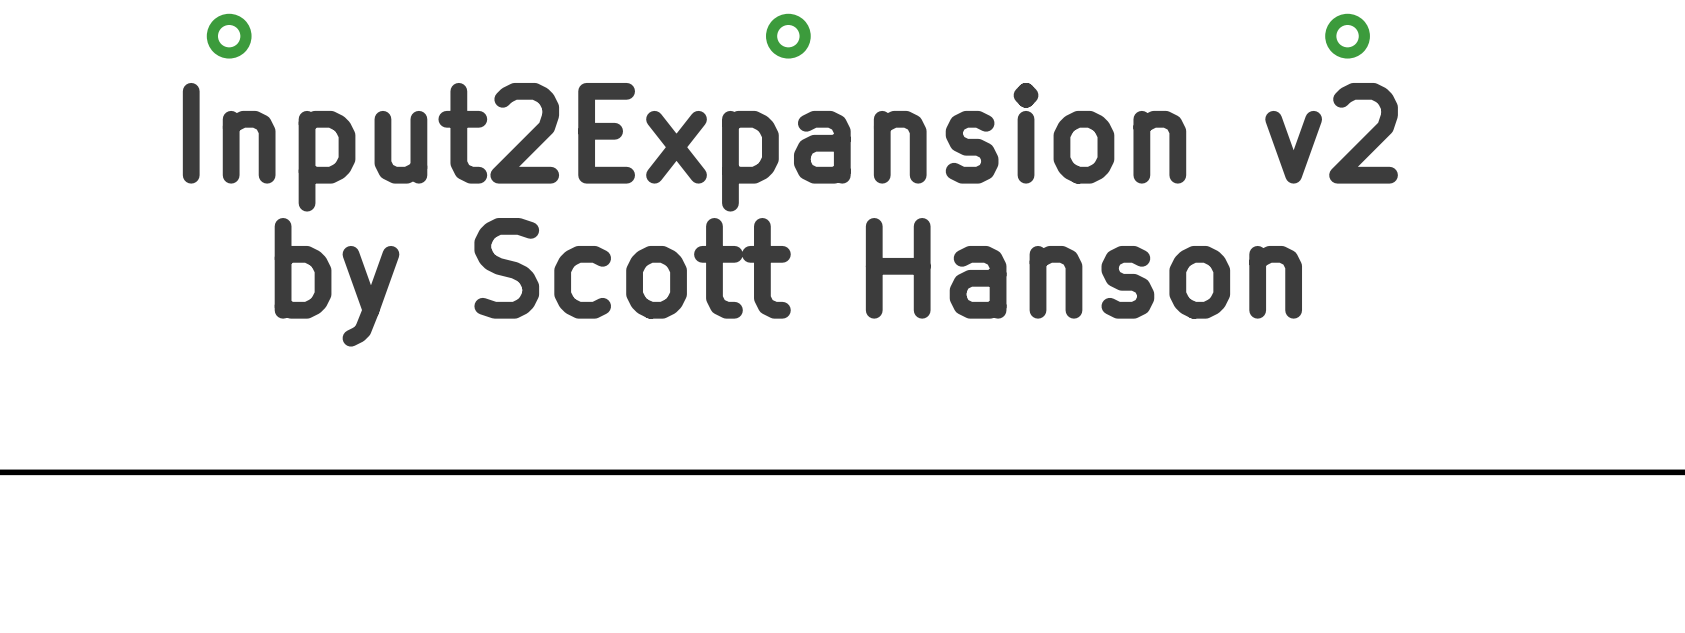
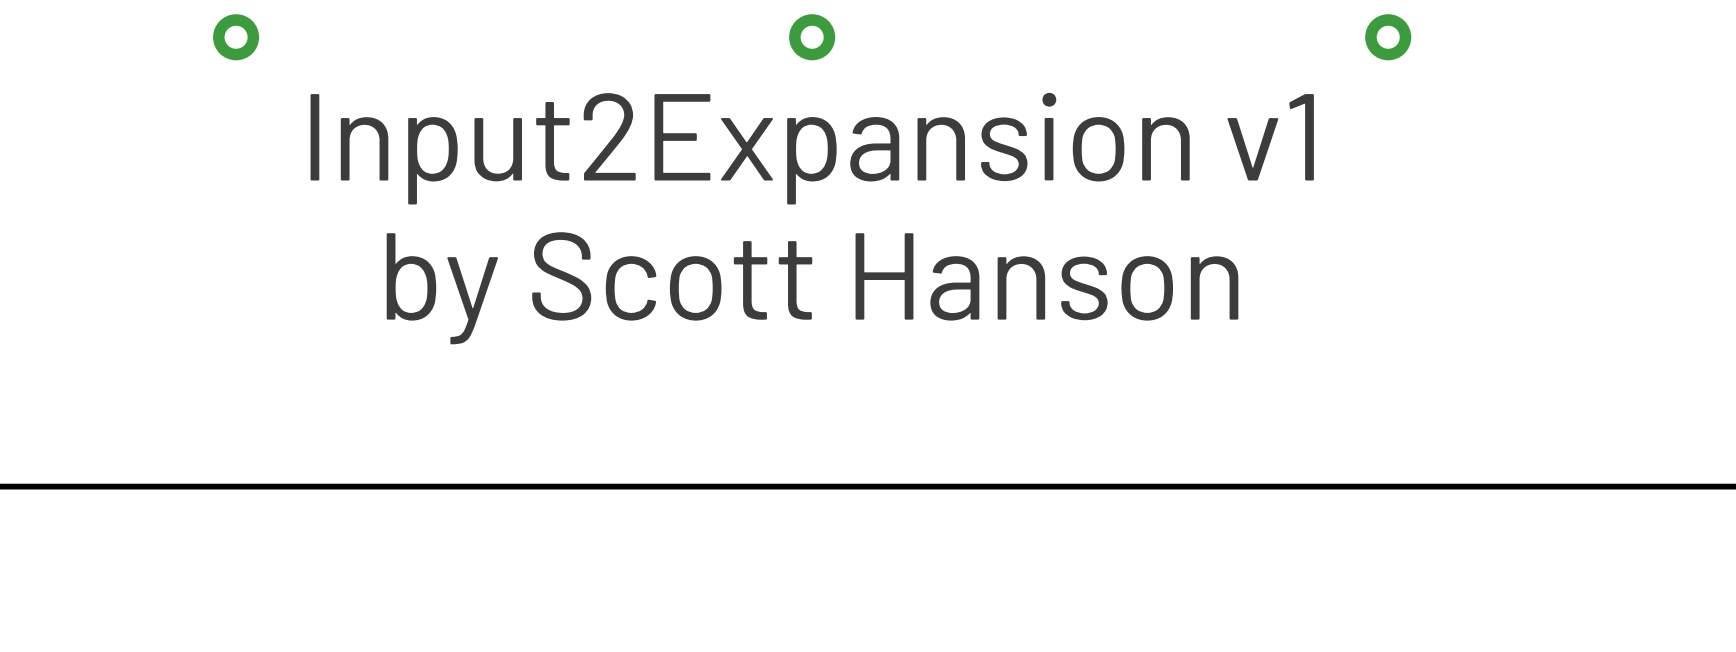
text: Input2Expansion v2 (790, 147) -> Input2Expansion v1 (812, 148)

